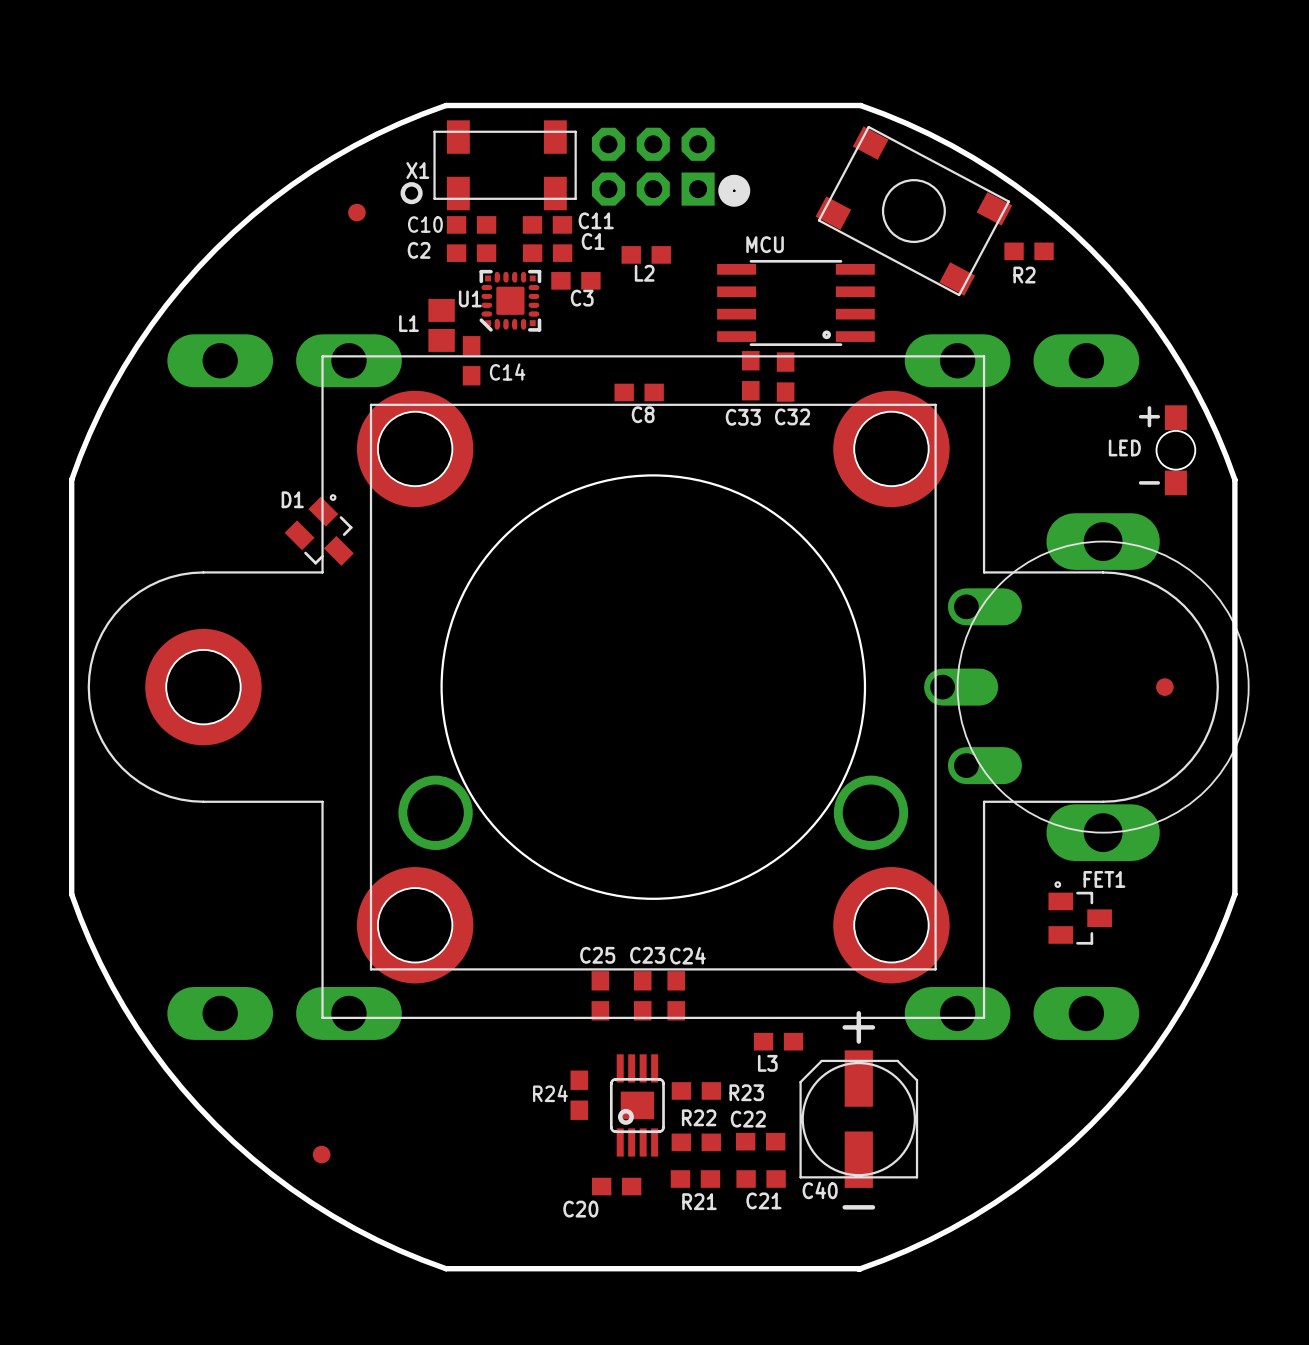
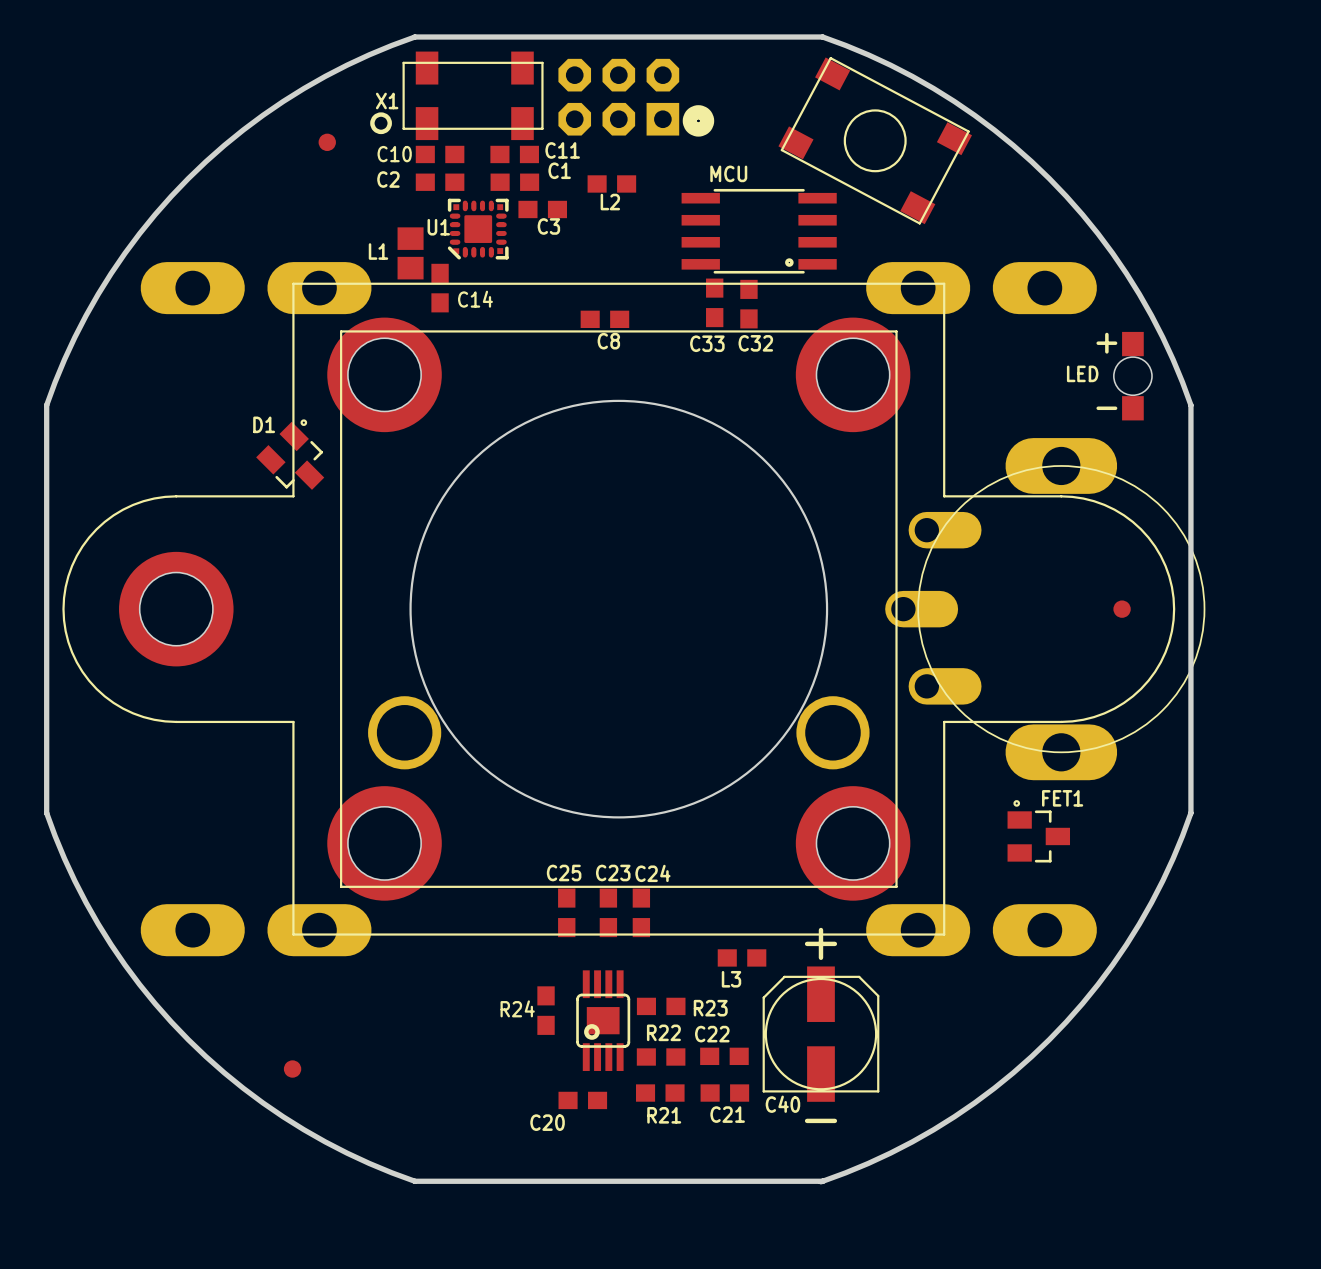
R2: (1029, 251) -> none

